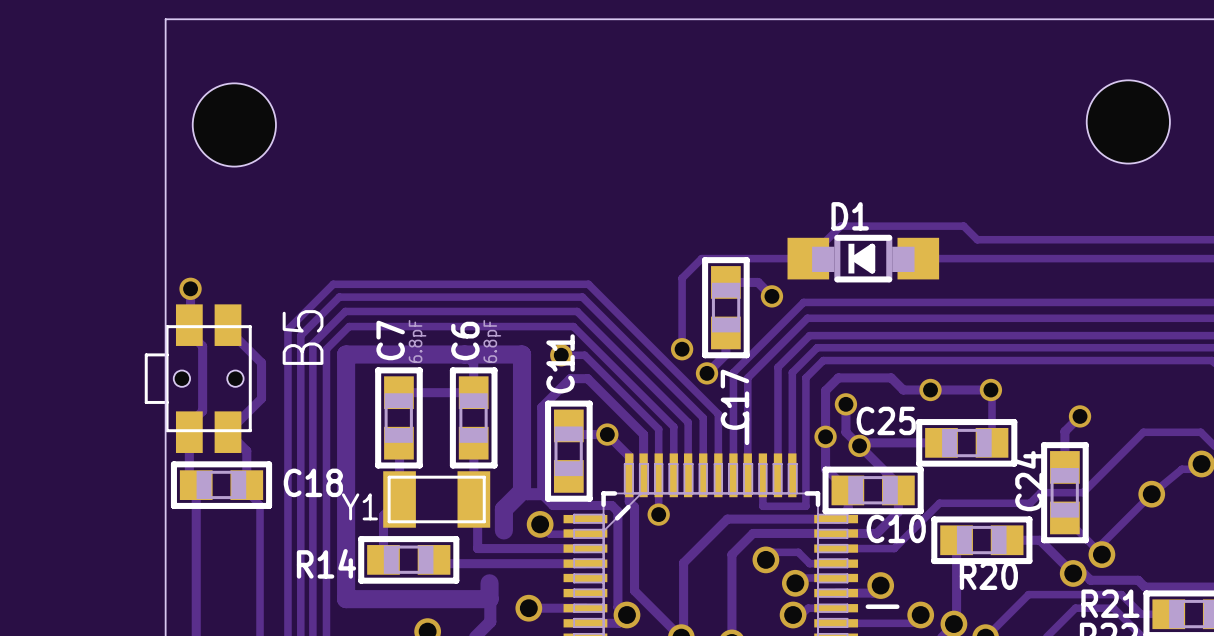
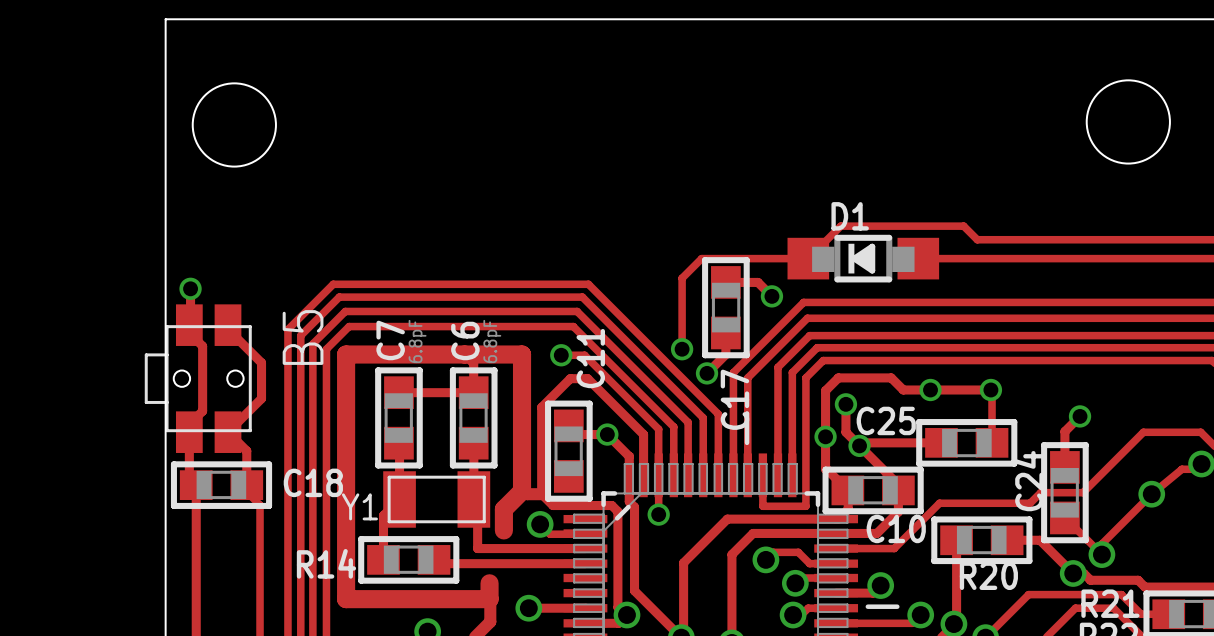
C11 name position: C11 (560, 363) -> C11 (590, 358)

